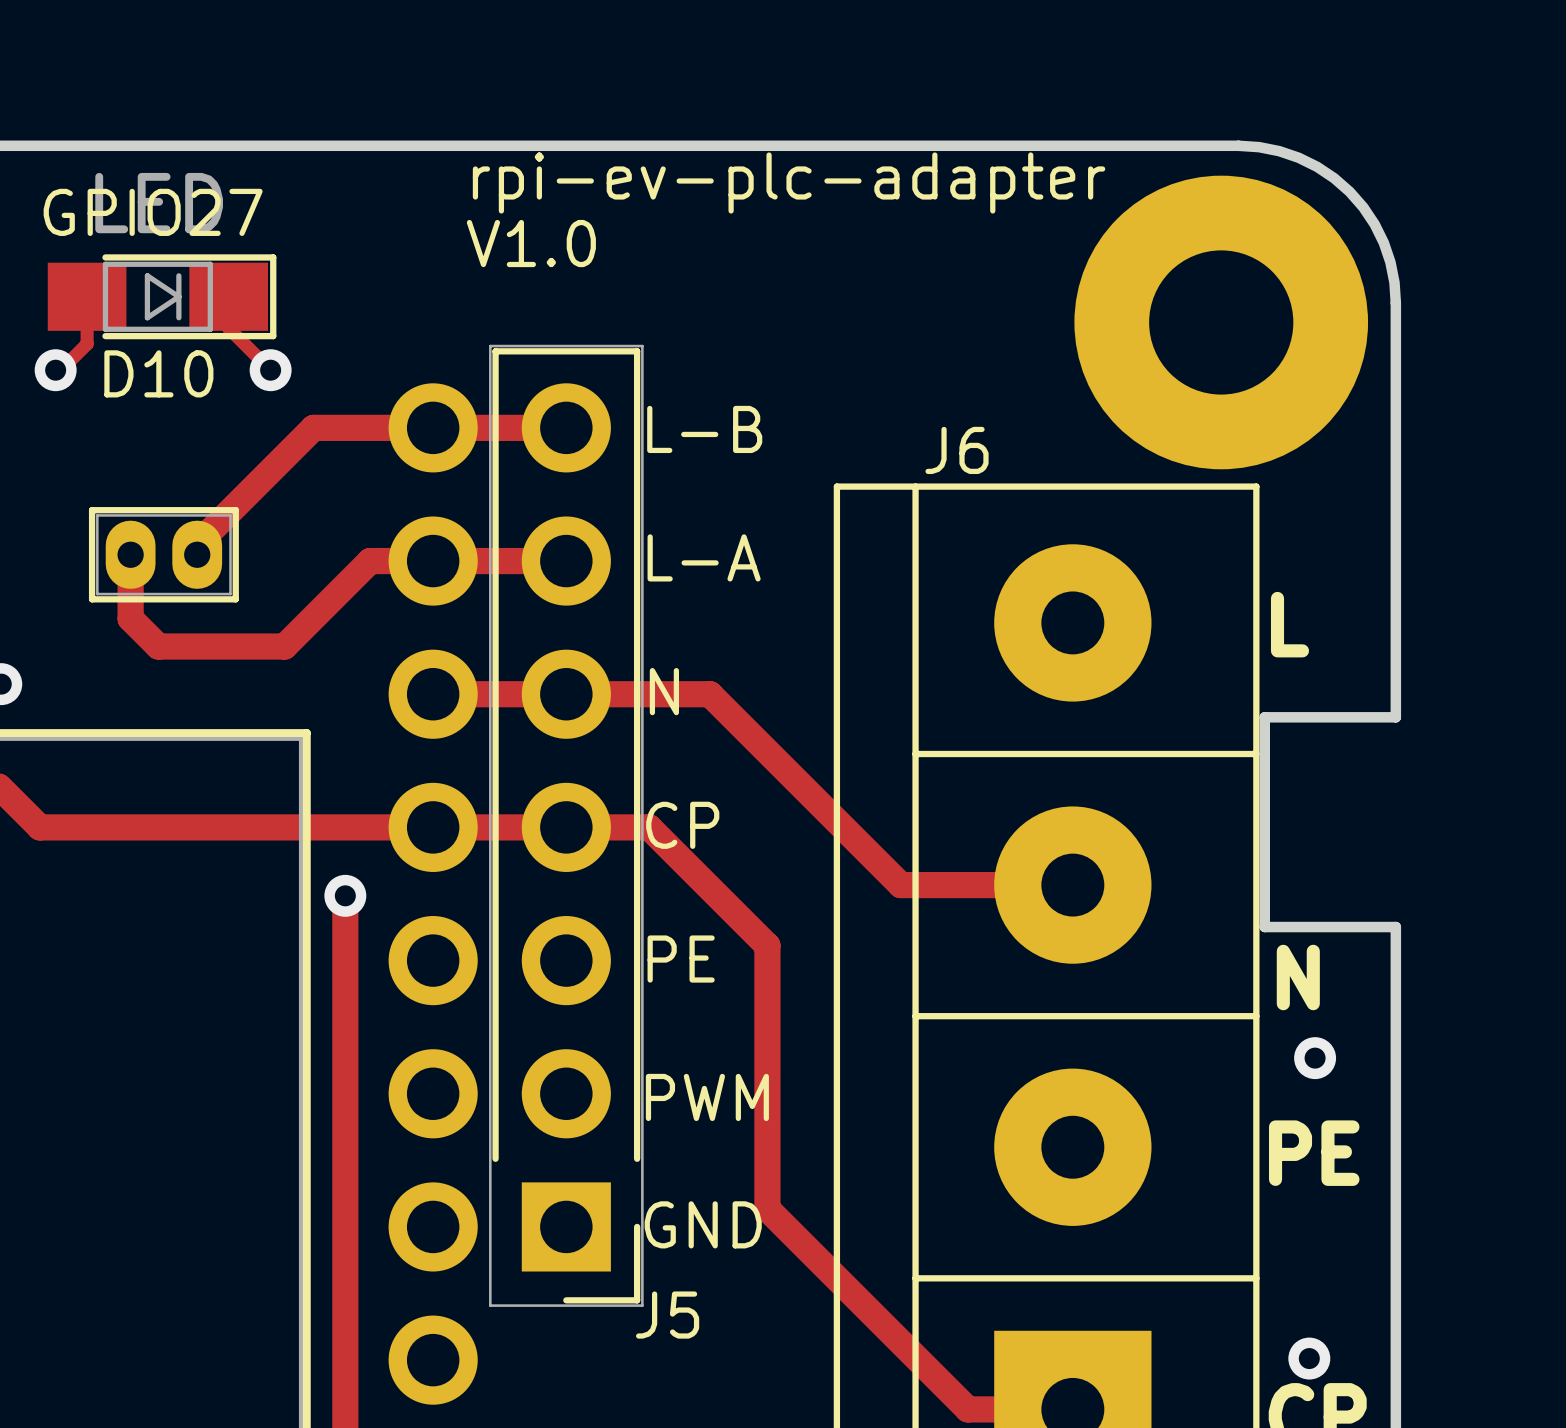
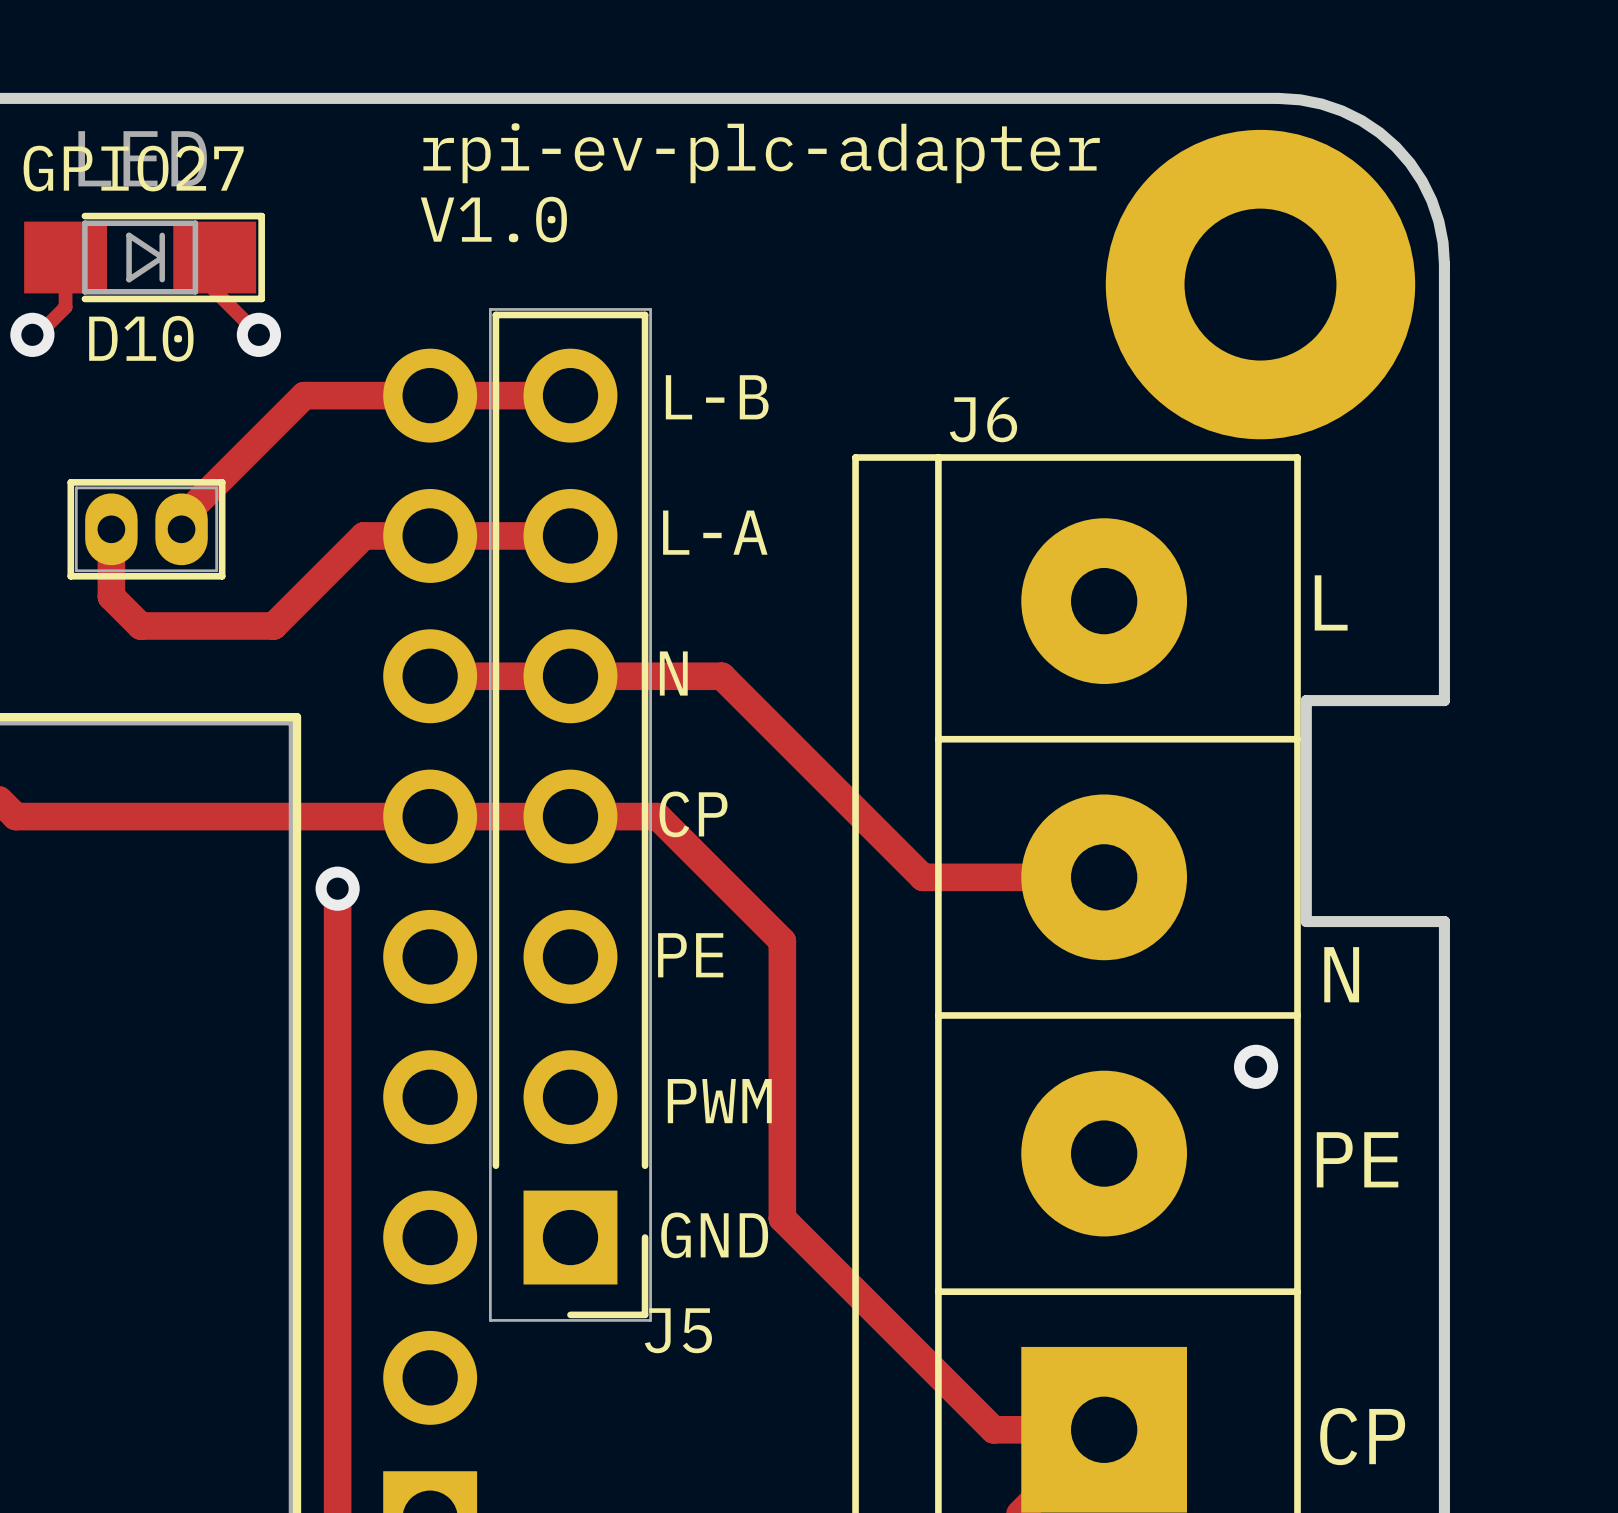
text position: rpi-ev-plc-adapter (789, 182) -> rpi-ev-plc-adapter (761, 153)
text position: V1.0 (531, 243) -> V1.0 (493, 219)
via position: (1315, 1058) -> (1256, 1066)
via: (1309, 1358) -> none

